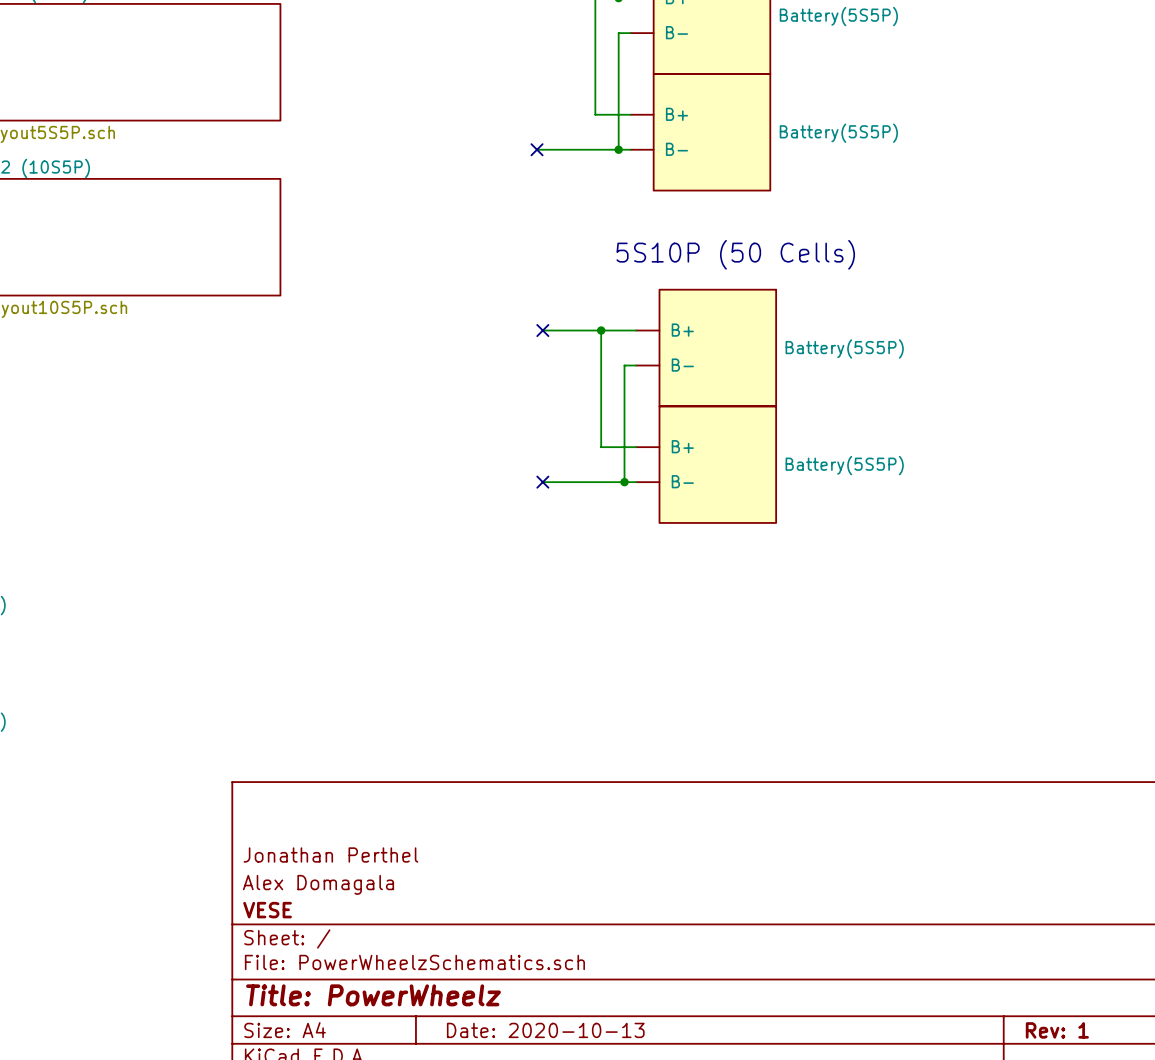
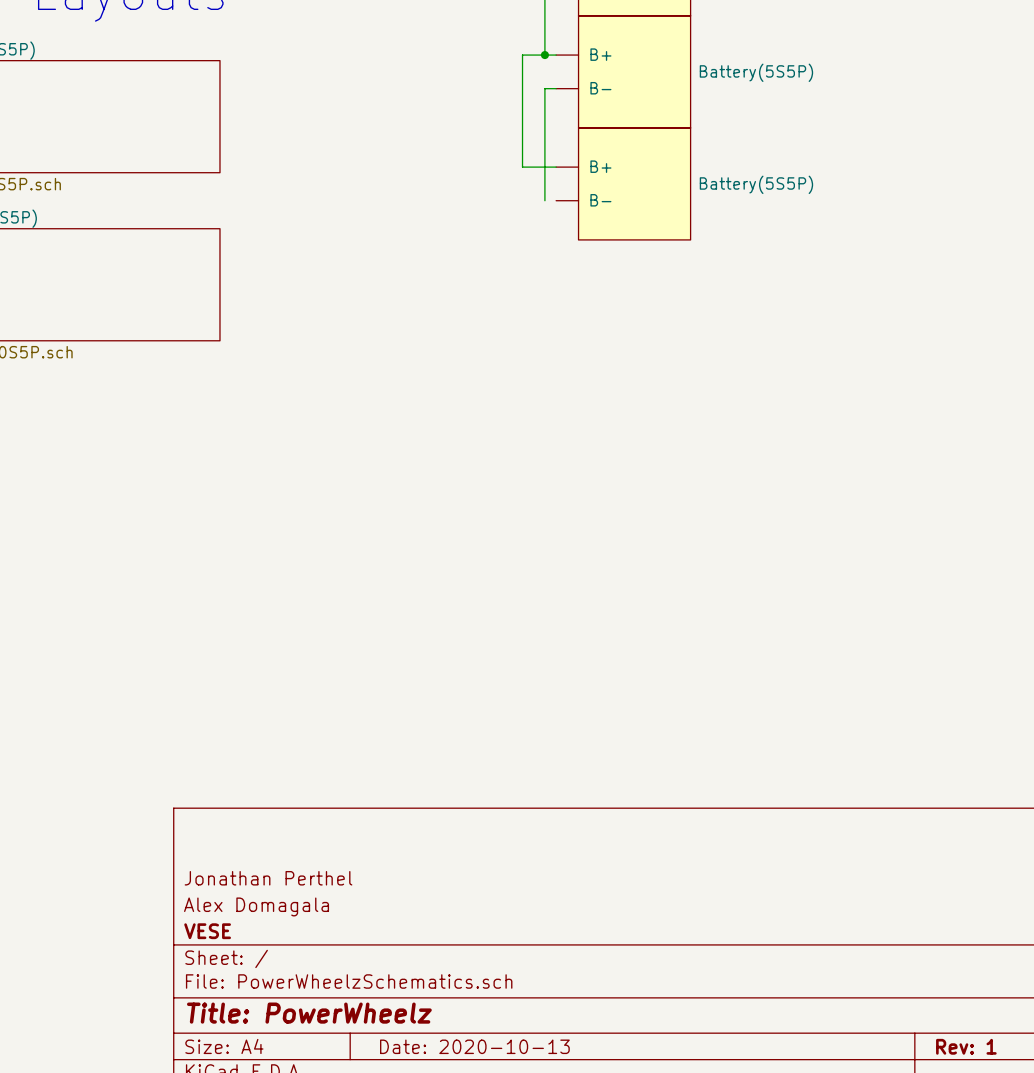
wire: (537, 149) (630, 149) -> none
no-connect mark: (537, 149) -> none
junction: (618, 149) -> none
text: 5S10P (50 Cells) (735, 254) -> none
wire: (542, 330) (636, 330) -> none
no-connect mark: (542, 330) -> none
wire: (601, 330) (601, 447) (636, 447) -> none
junction: (601, 330) -> none
part: Battery(5S5P) (706, 348) -> none
wire: (636, 365) (624, 365) (624, 482) -> none
part: Battery(5S5P) (706, 464) -> none
wire: (542, 482) (636, 482) -> none
no-connect mark: (542, 482) -> none
junction: (624, 482) -> none

